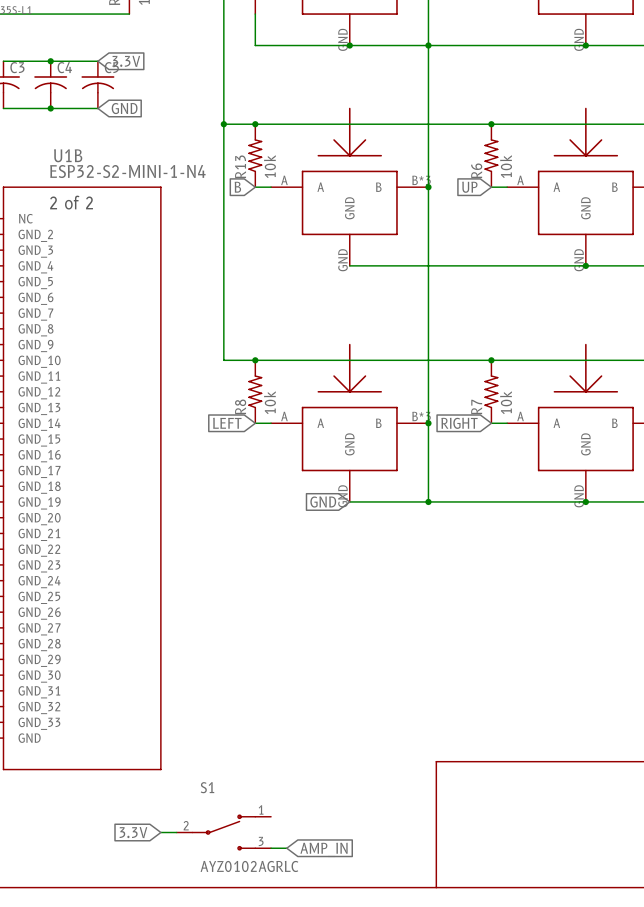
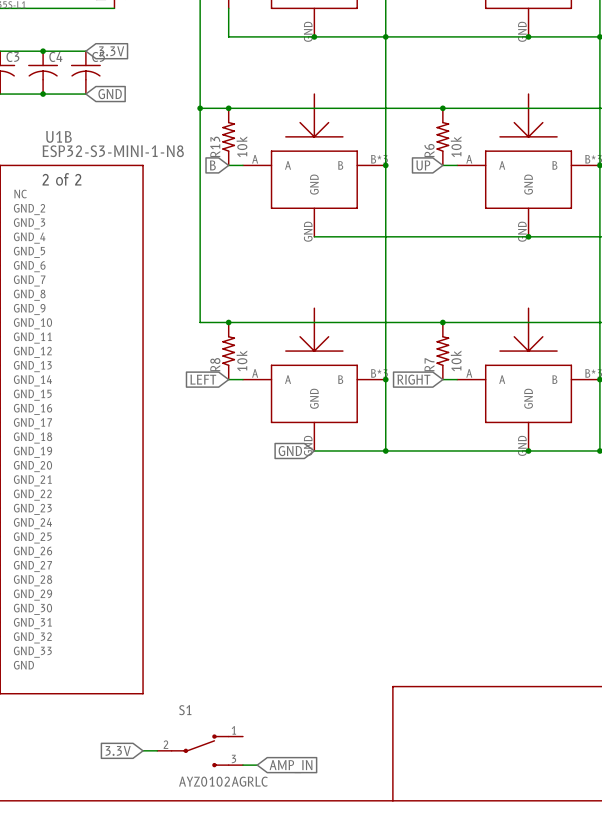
U1B value: ESP32-S2-MINI-1-N4 (127, 171) -> ESP32-S3-MINI-1-N8 (113, 151)

